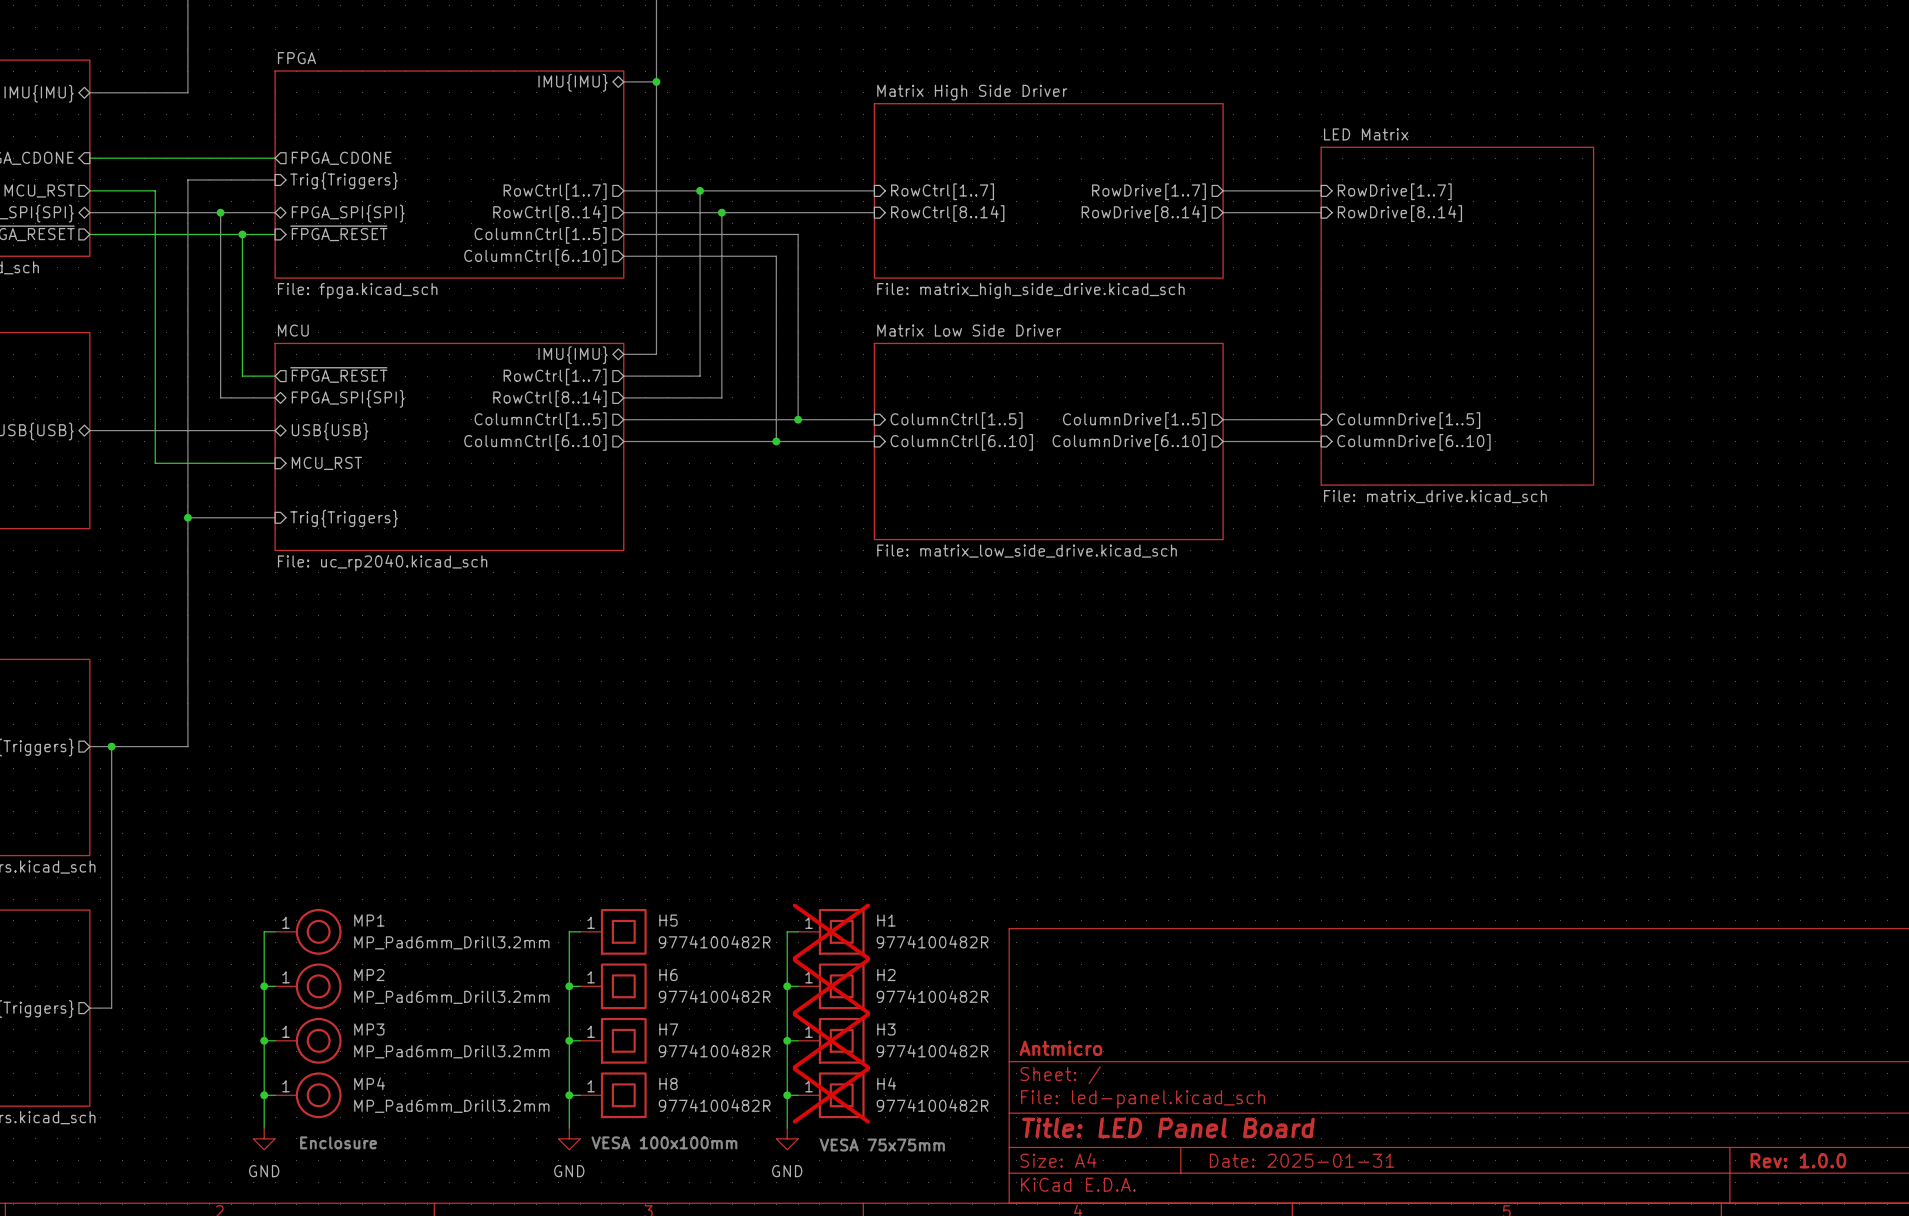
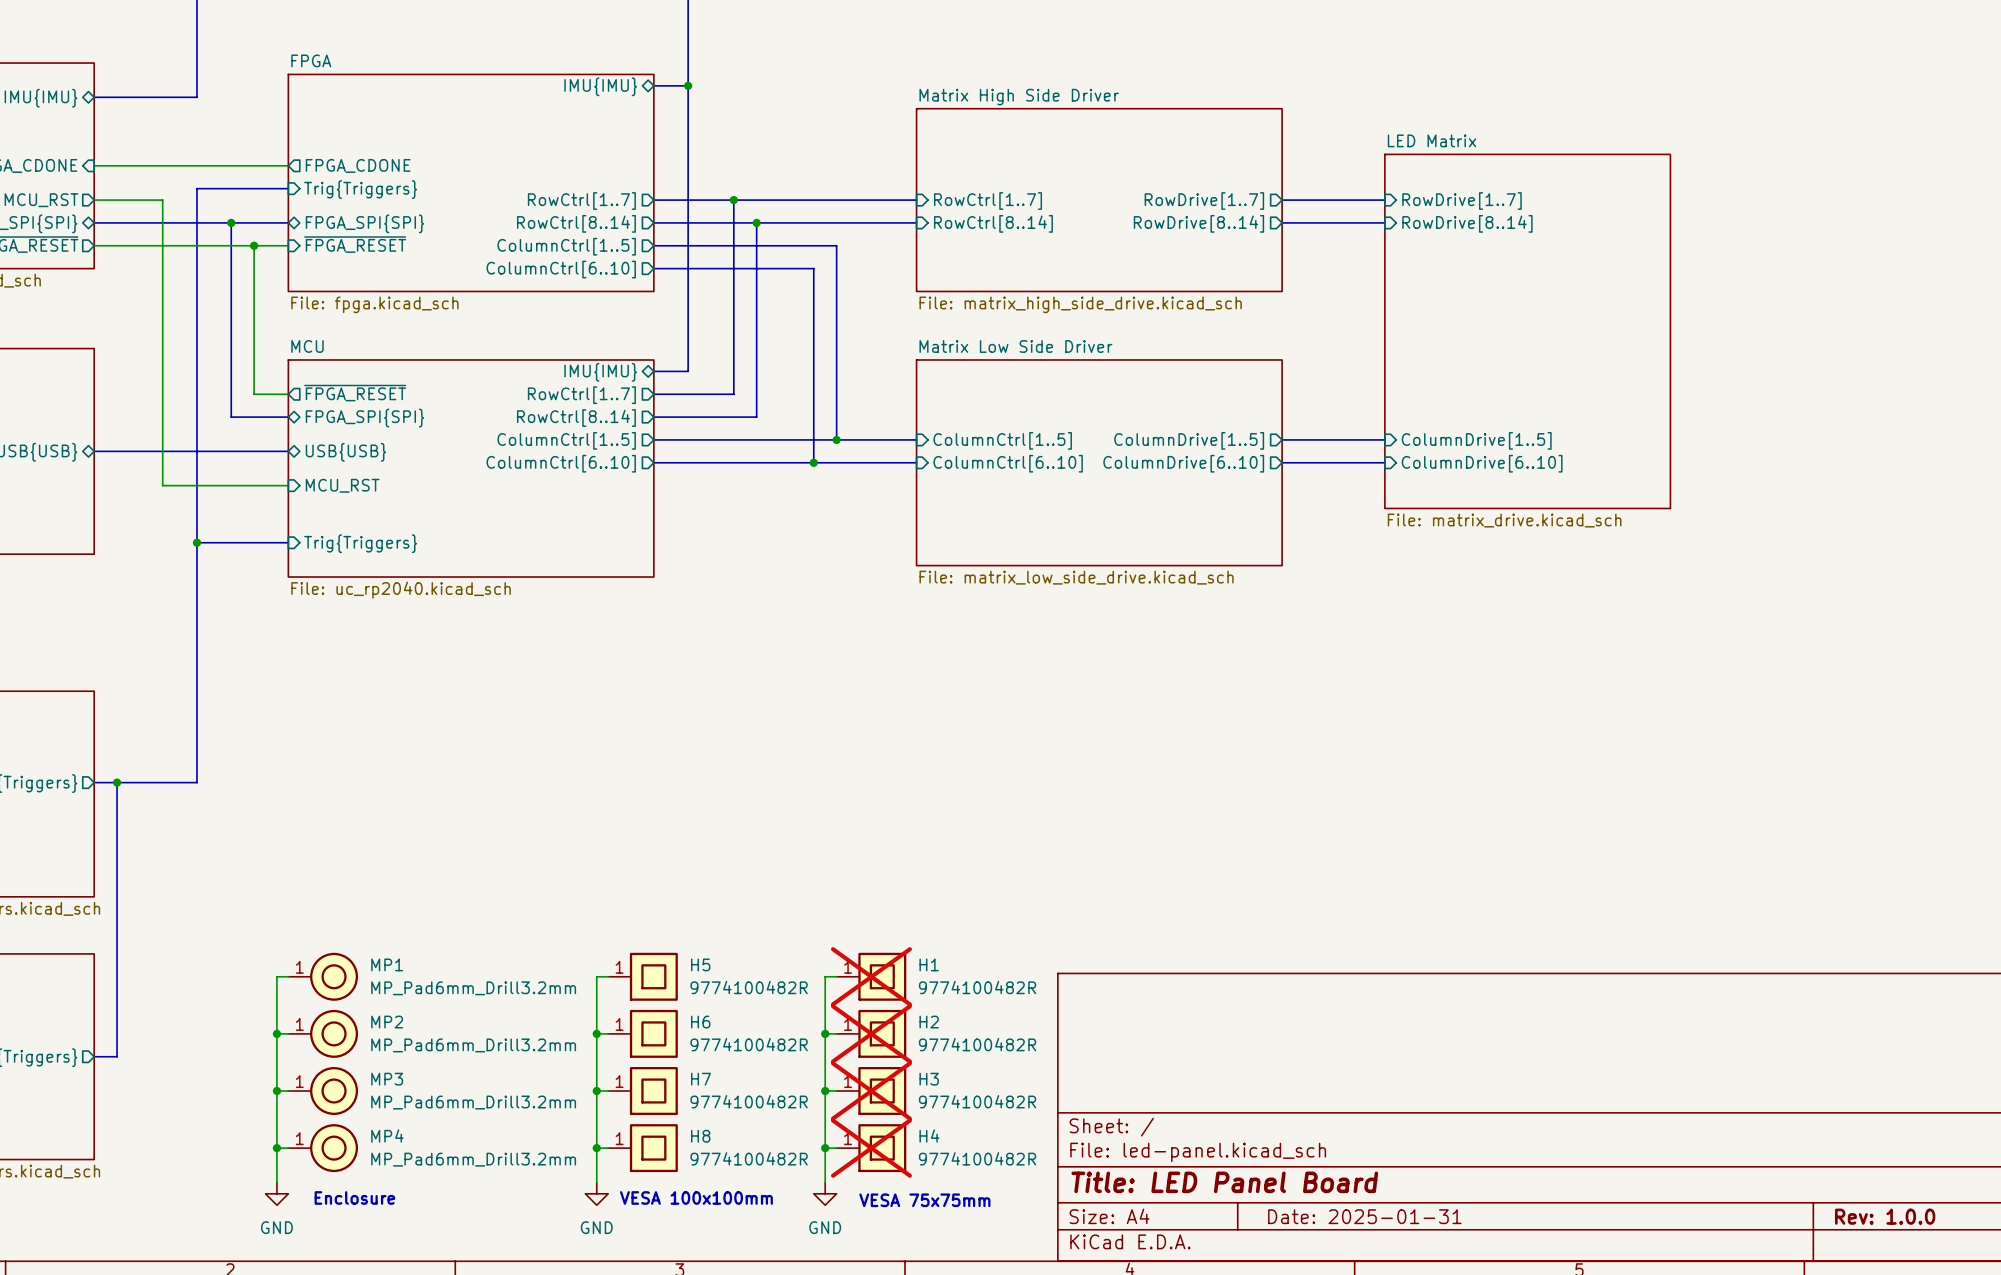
title block: Antmicro (1060, 1048) -> none

